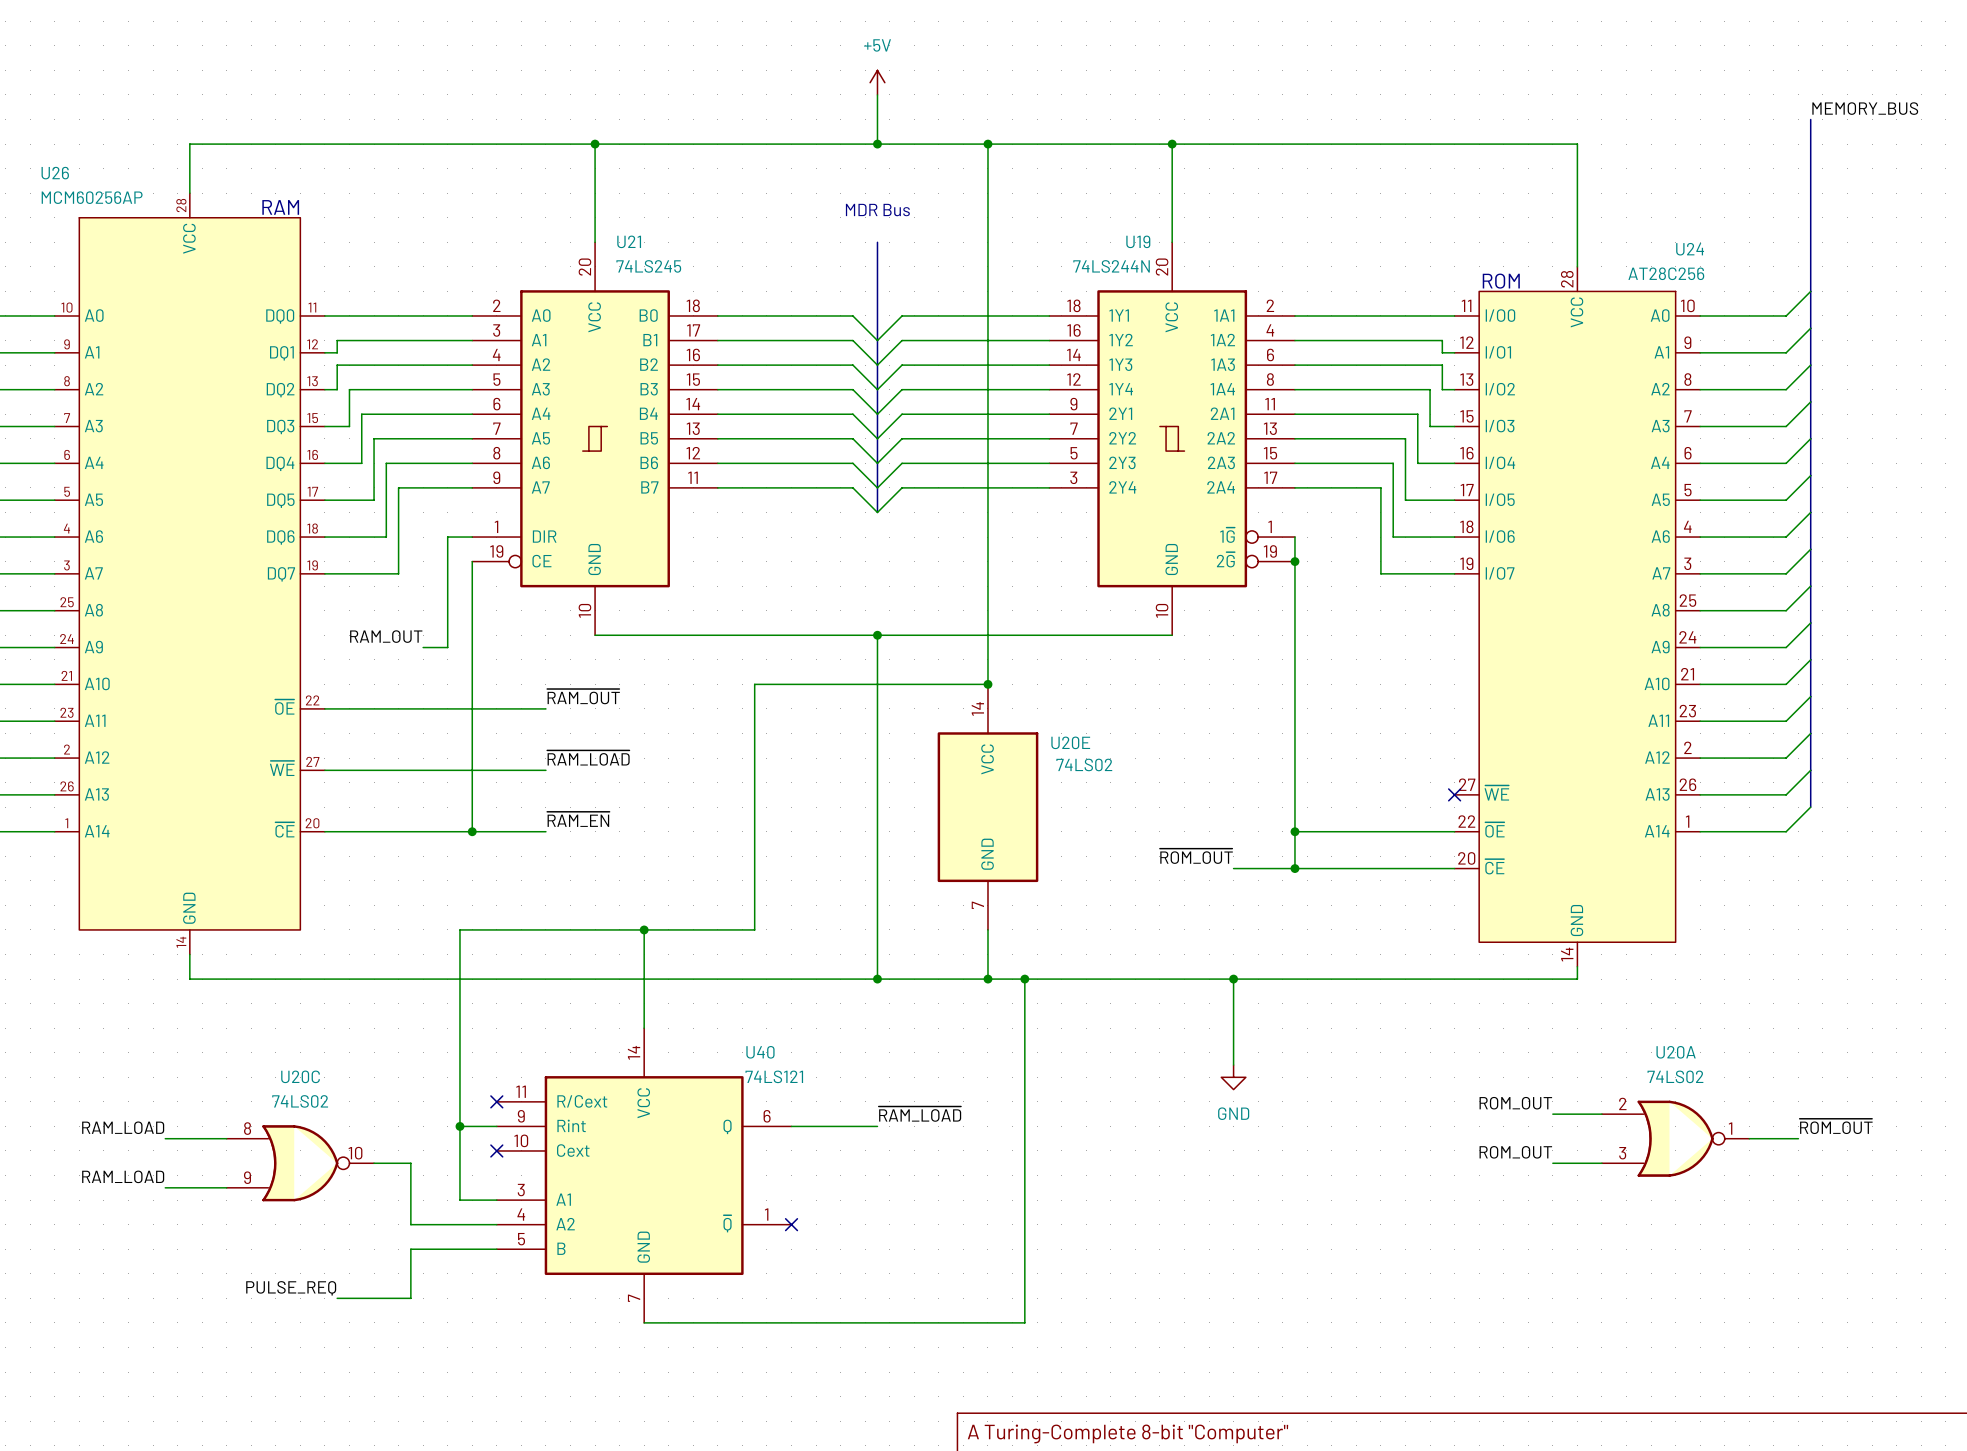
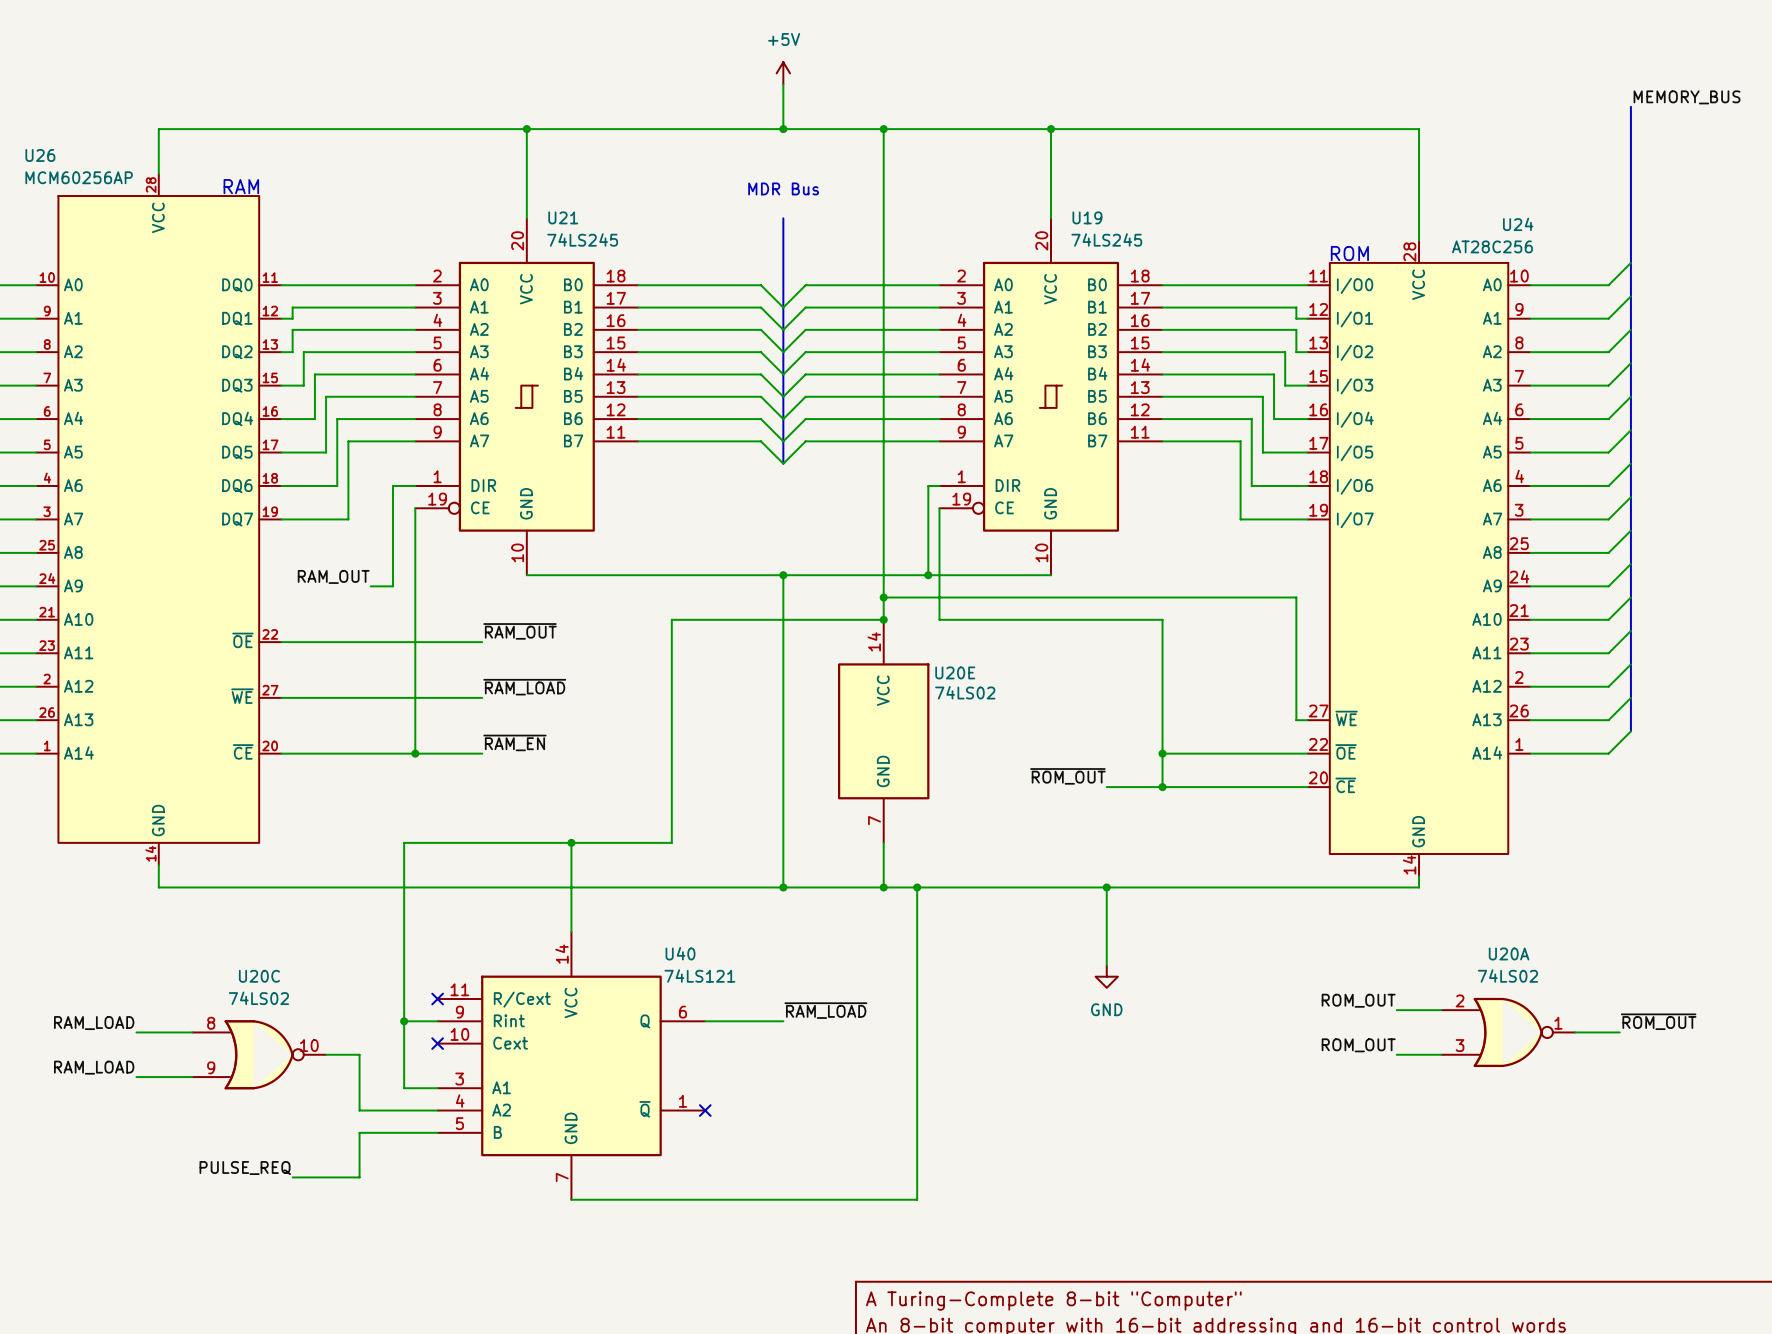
U19 name position: U19 (1138, 241) -> U19 (1087, 217)
U19 symbol: [1049, 242, 1295, 636] -> [939, 218, 1163, 576]
U19 value: 74LS244N (1111, 266) -> 74LS245 (1106, 239)
wire: none -> (939, 485) (928, 485) (928, 575)
wire: (1294, 537) (1294, 684) -> (939, 508) (939, 619) (1162, 619)
junction: (1294, 561) -> none
junction: none -> (928, 575)
wire: none -> (883, 597) (1296, 597) (1296, 720) (1307, 720)
junction: none -> (883, 597)
no-connect mark: (1454, 794) -> none

